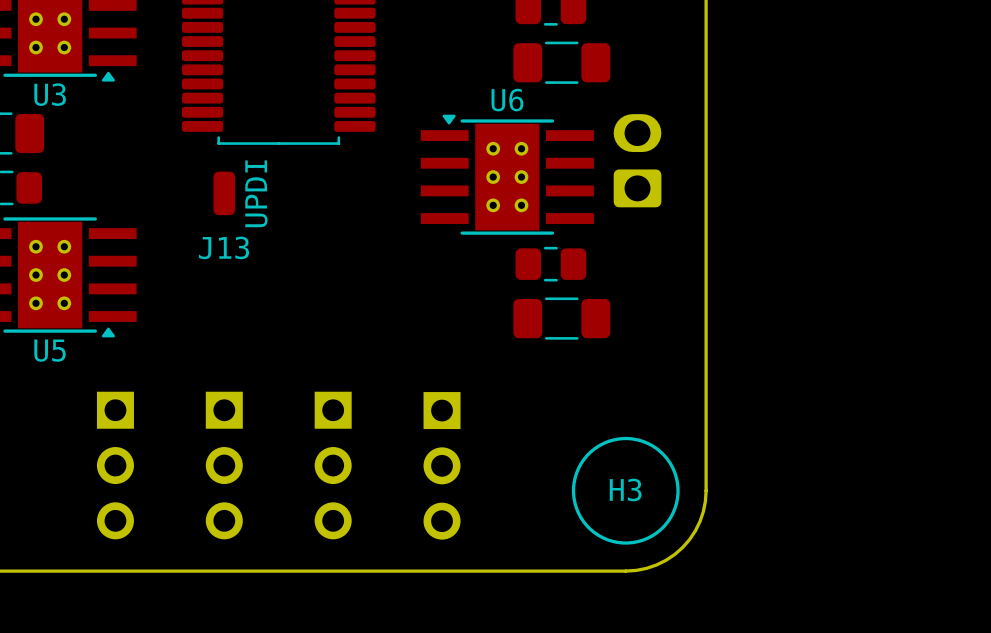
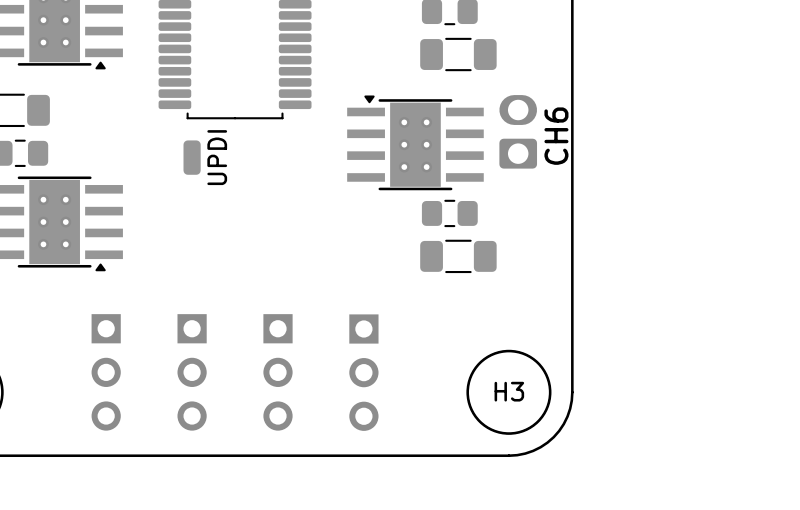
U3 name: U3 (50, 94) -> none
U6 name: U6 (507, 100) -> none
text: none -> CH6 (556, 136)
J13 name: J13 (223, 247) -> none
U5 name: U5 (50, 350) -> none

